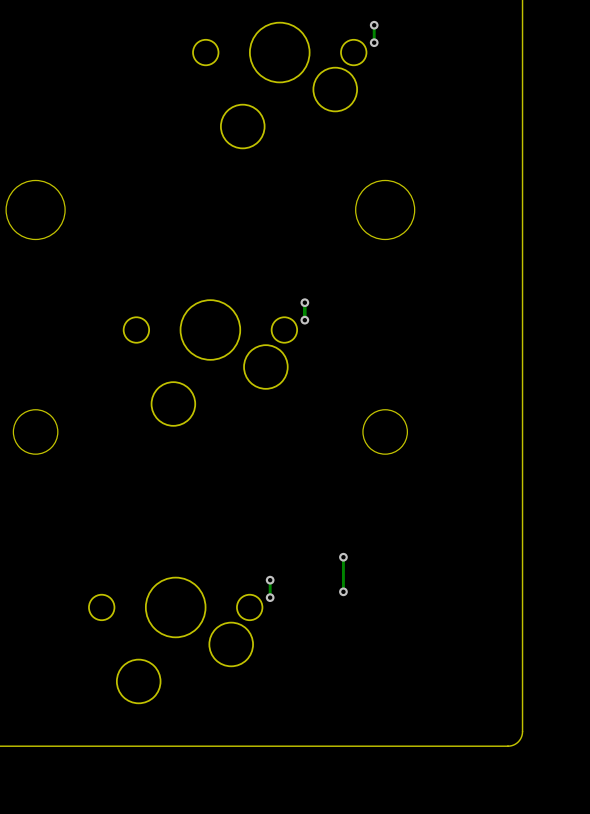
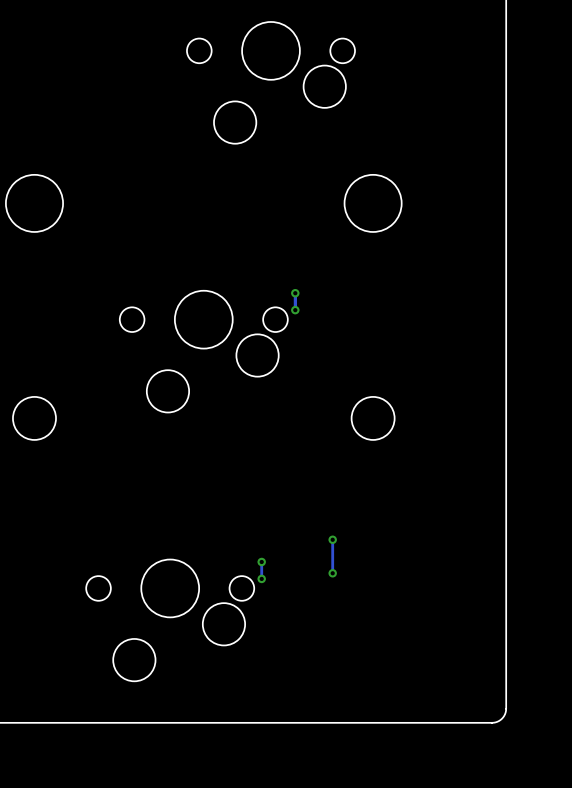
track: (374, 25) (374, 42) -> none
via: (374, 25) -> none
via: (374, 42) -> none

